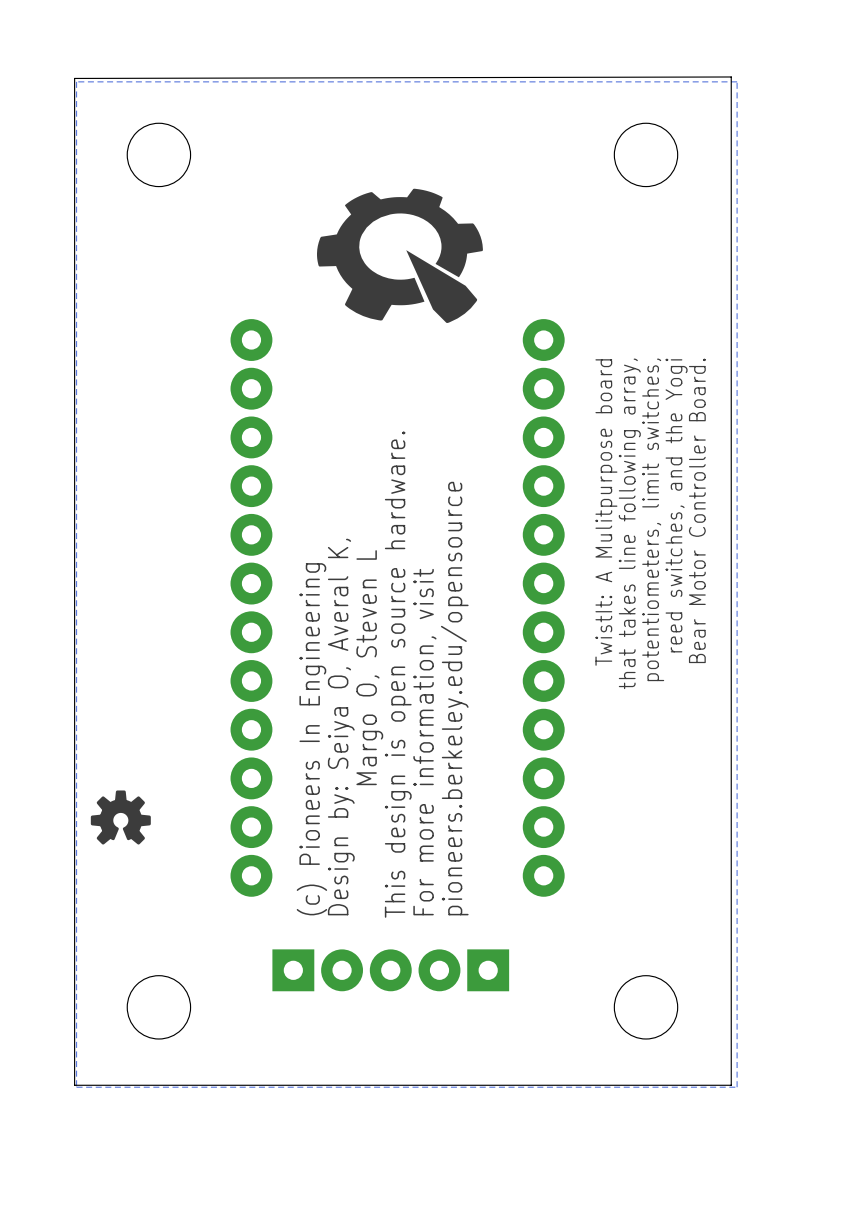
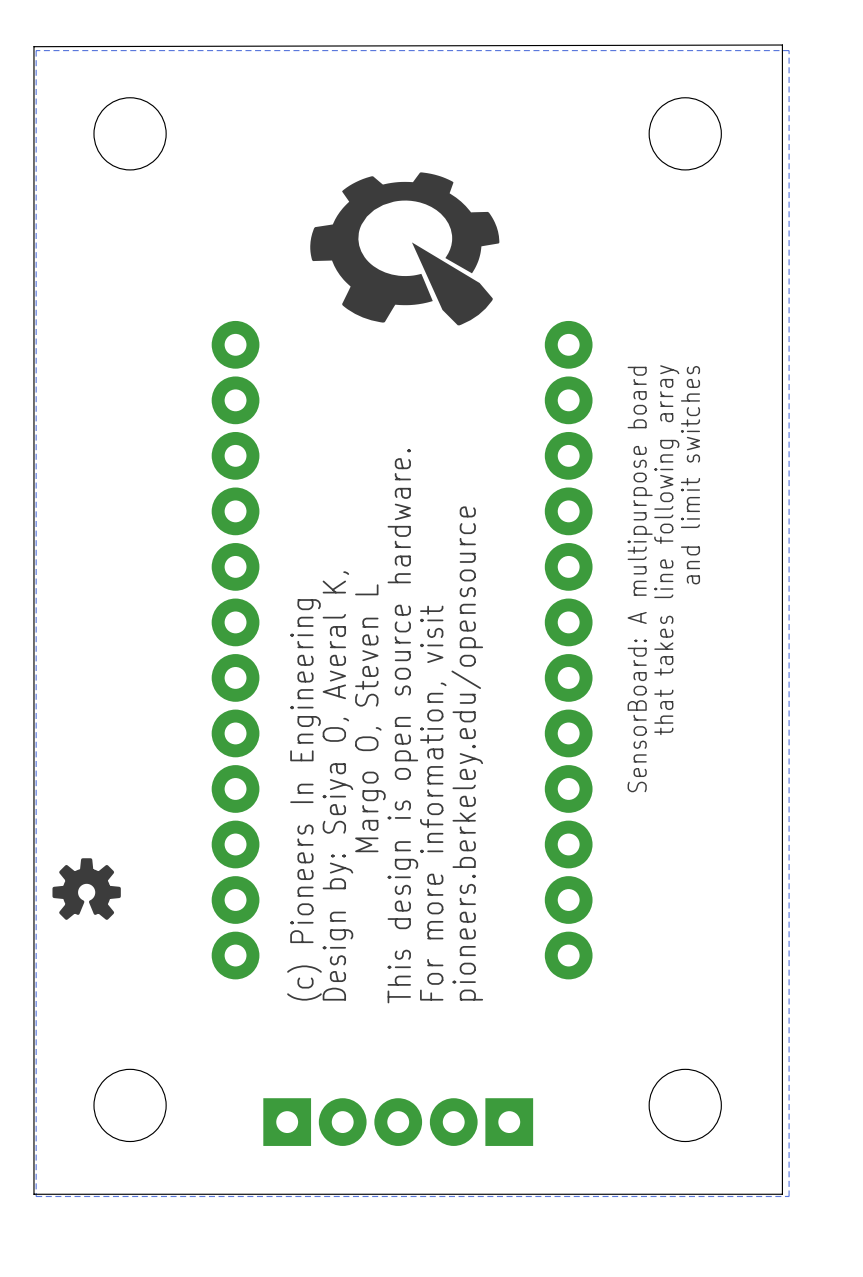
text: reed switches, and the Yogi (676, 505) -> none
text: Bear Motor Controller Board. (697, 510) -> none
text: TwistIt: A Mulitpurpose board (606, 512) -> SensorBoard: A multipurpose board (640, 579)
text: potentiometers, limit switches, (653, 519) -> and limit switches (690, 475)
text: that takes line following array, (629, 523) -> that takes line following array (666, 550)
part position: (390, 970) -> (398, 1122)

